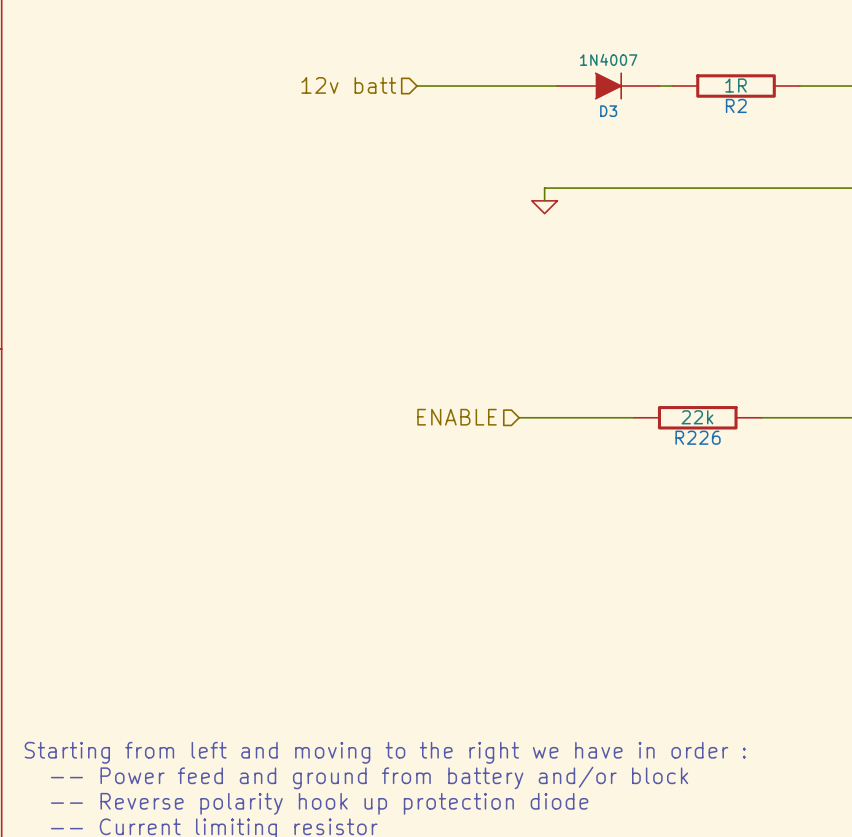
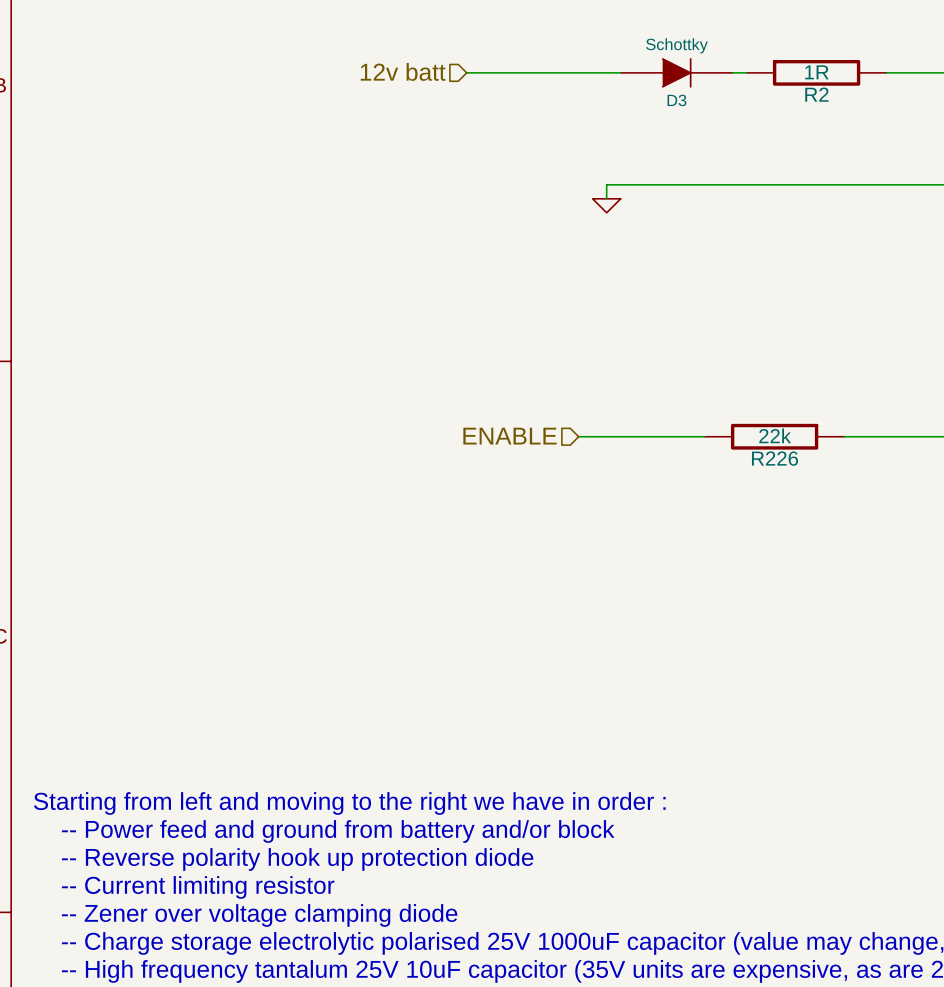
D3 value: 1N4007 (608, 59) -> Schottky (677, 45)

